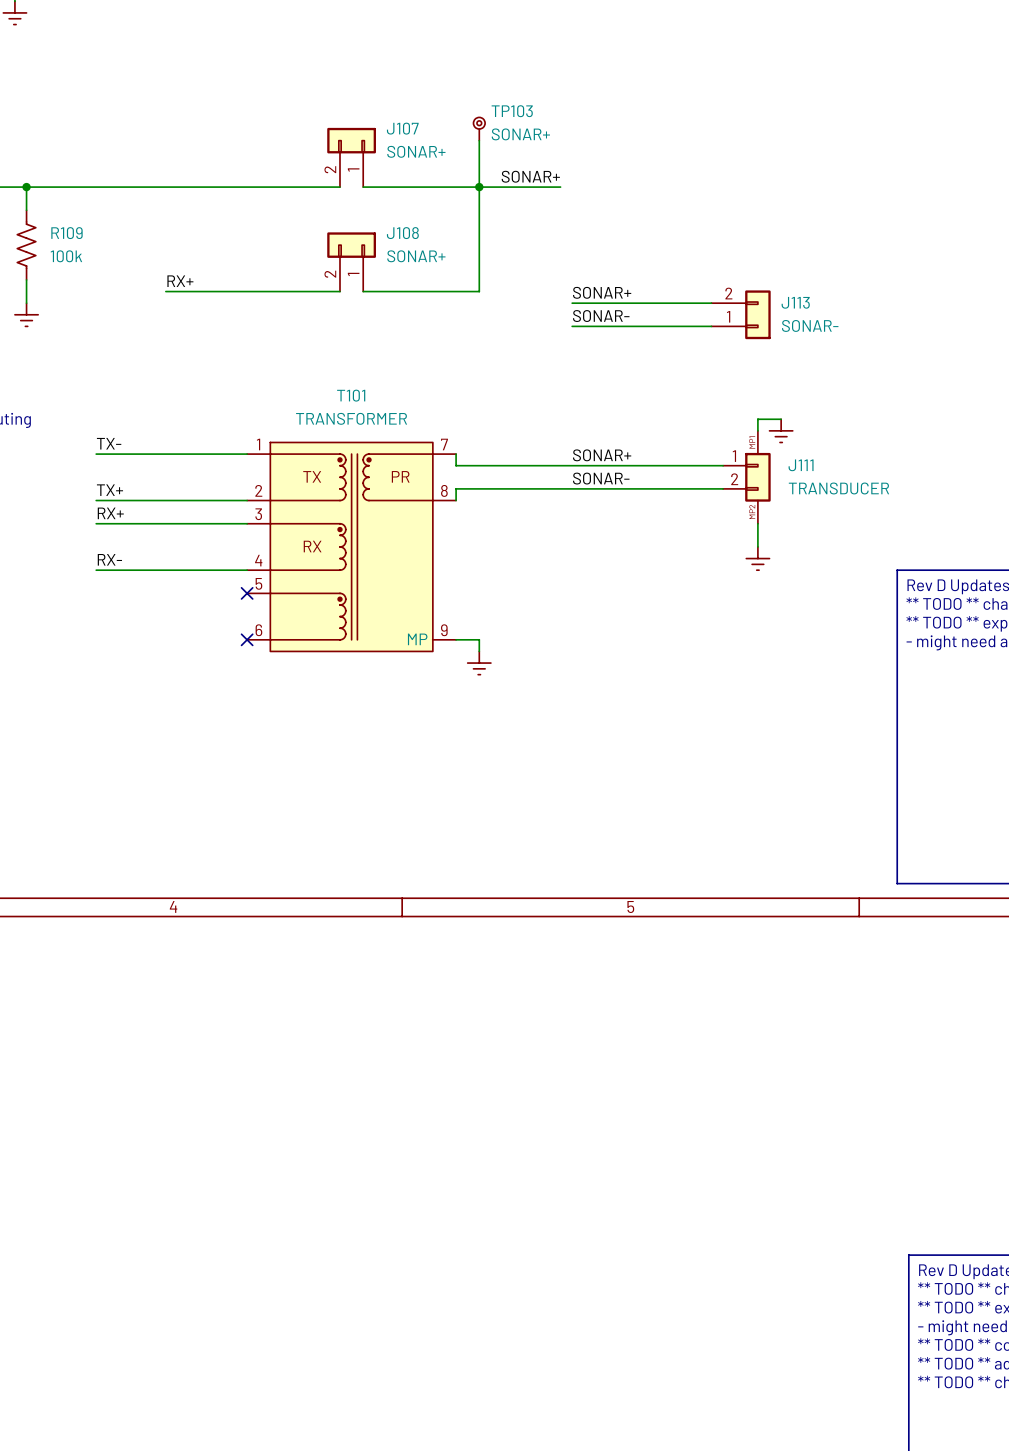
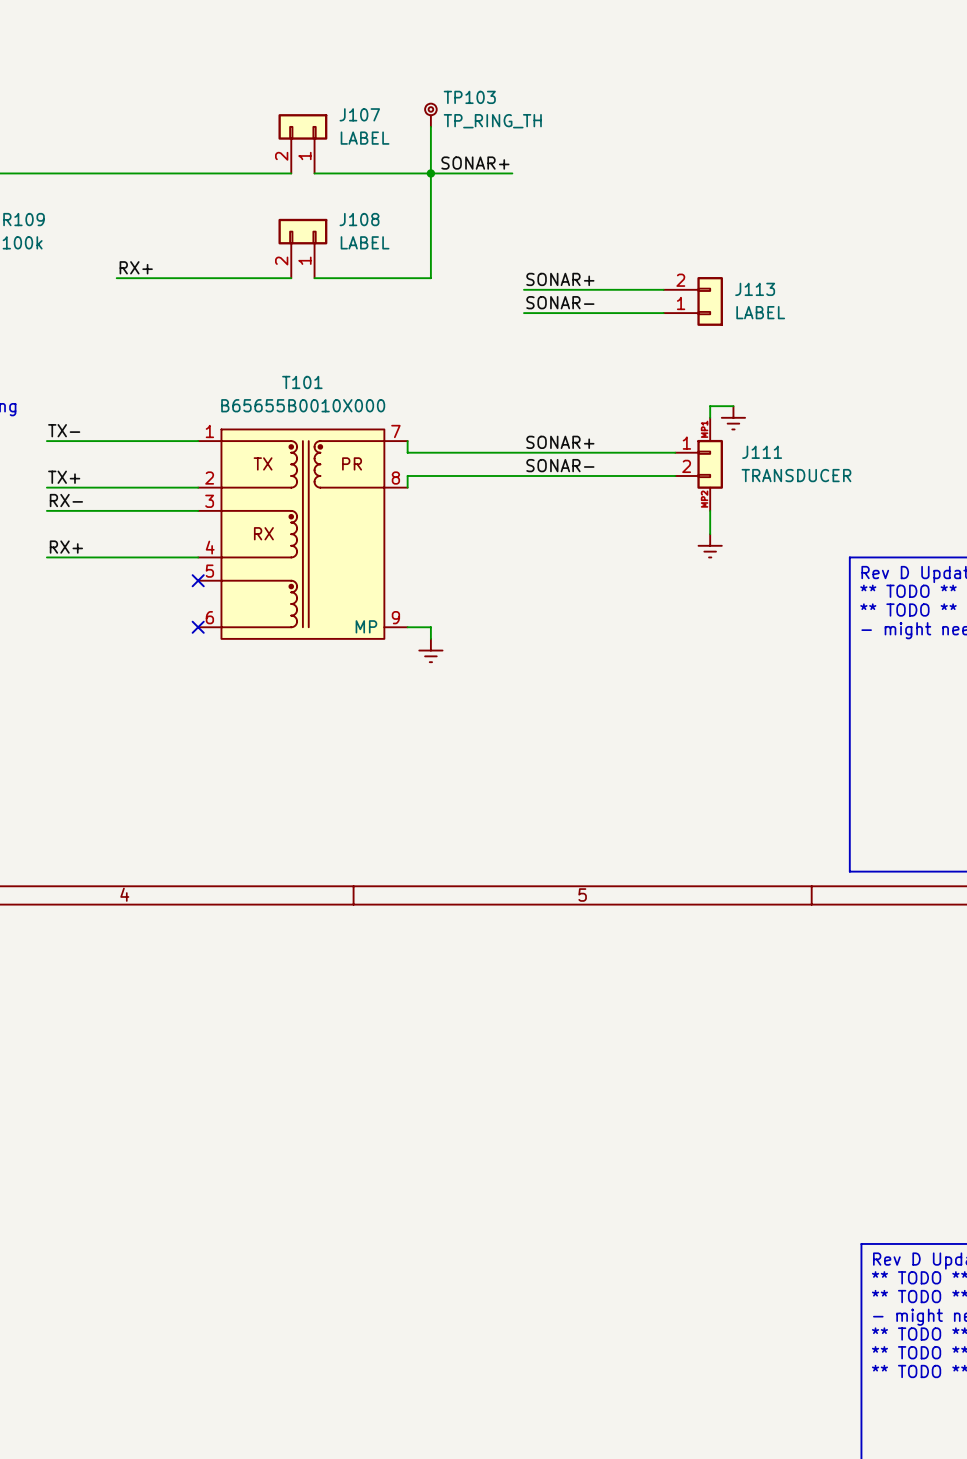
TP103 value: SONAR+ (520, 134) -> TP_RING_TH (492, 121)
J107 value: SONAR+ (416, 151) -> LABEL (365, 138)
J108 value: SONAR+ (416, 256) -> LABEL (365, 242)
J113 value: SONAR- (810, 325) -> LABEL (760, 312)
T101 value: TRANSFORMER (351, 418) -> B65655B0010X000 (303, 405)
label: RX+ (110, 513) -> RX- (66, 500)
label: RX- (109, 559) -> RX+ (66, 547)

